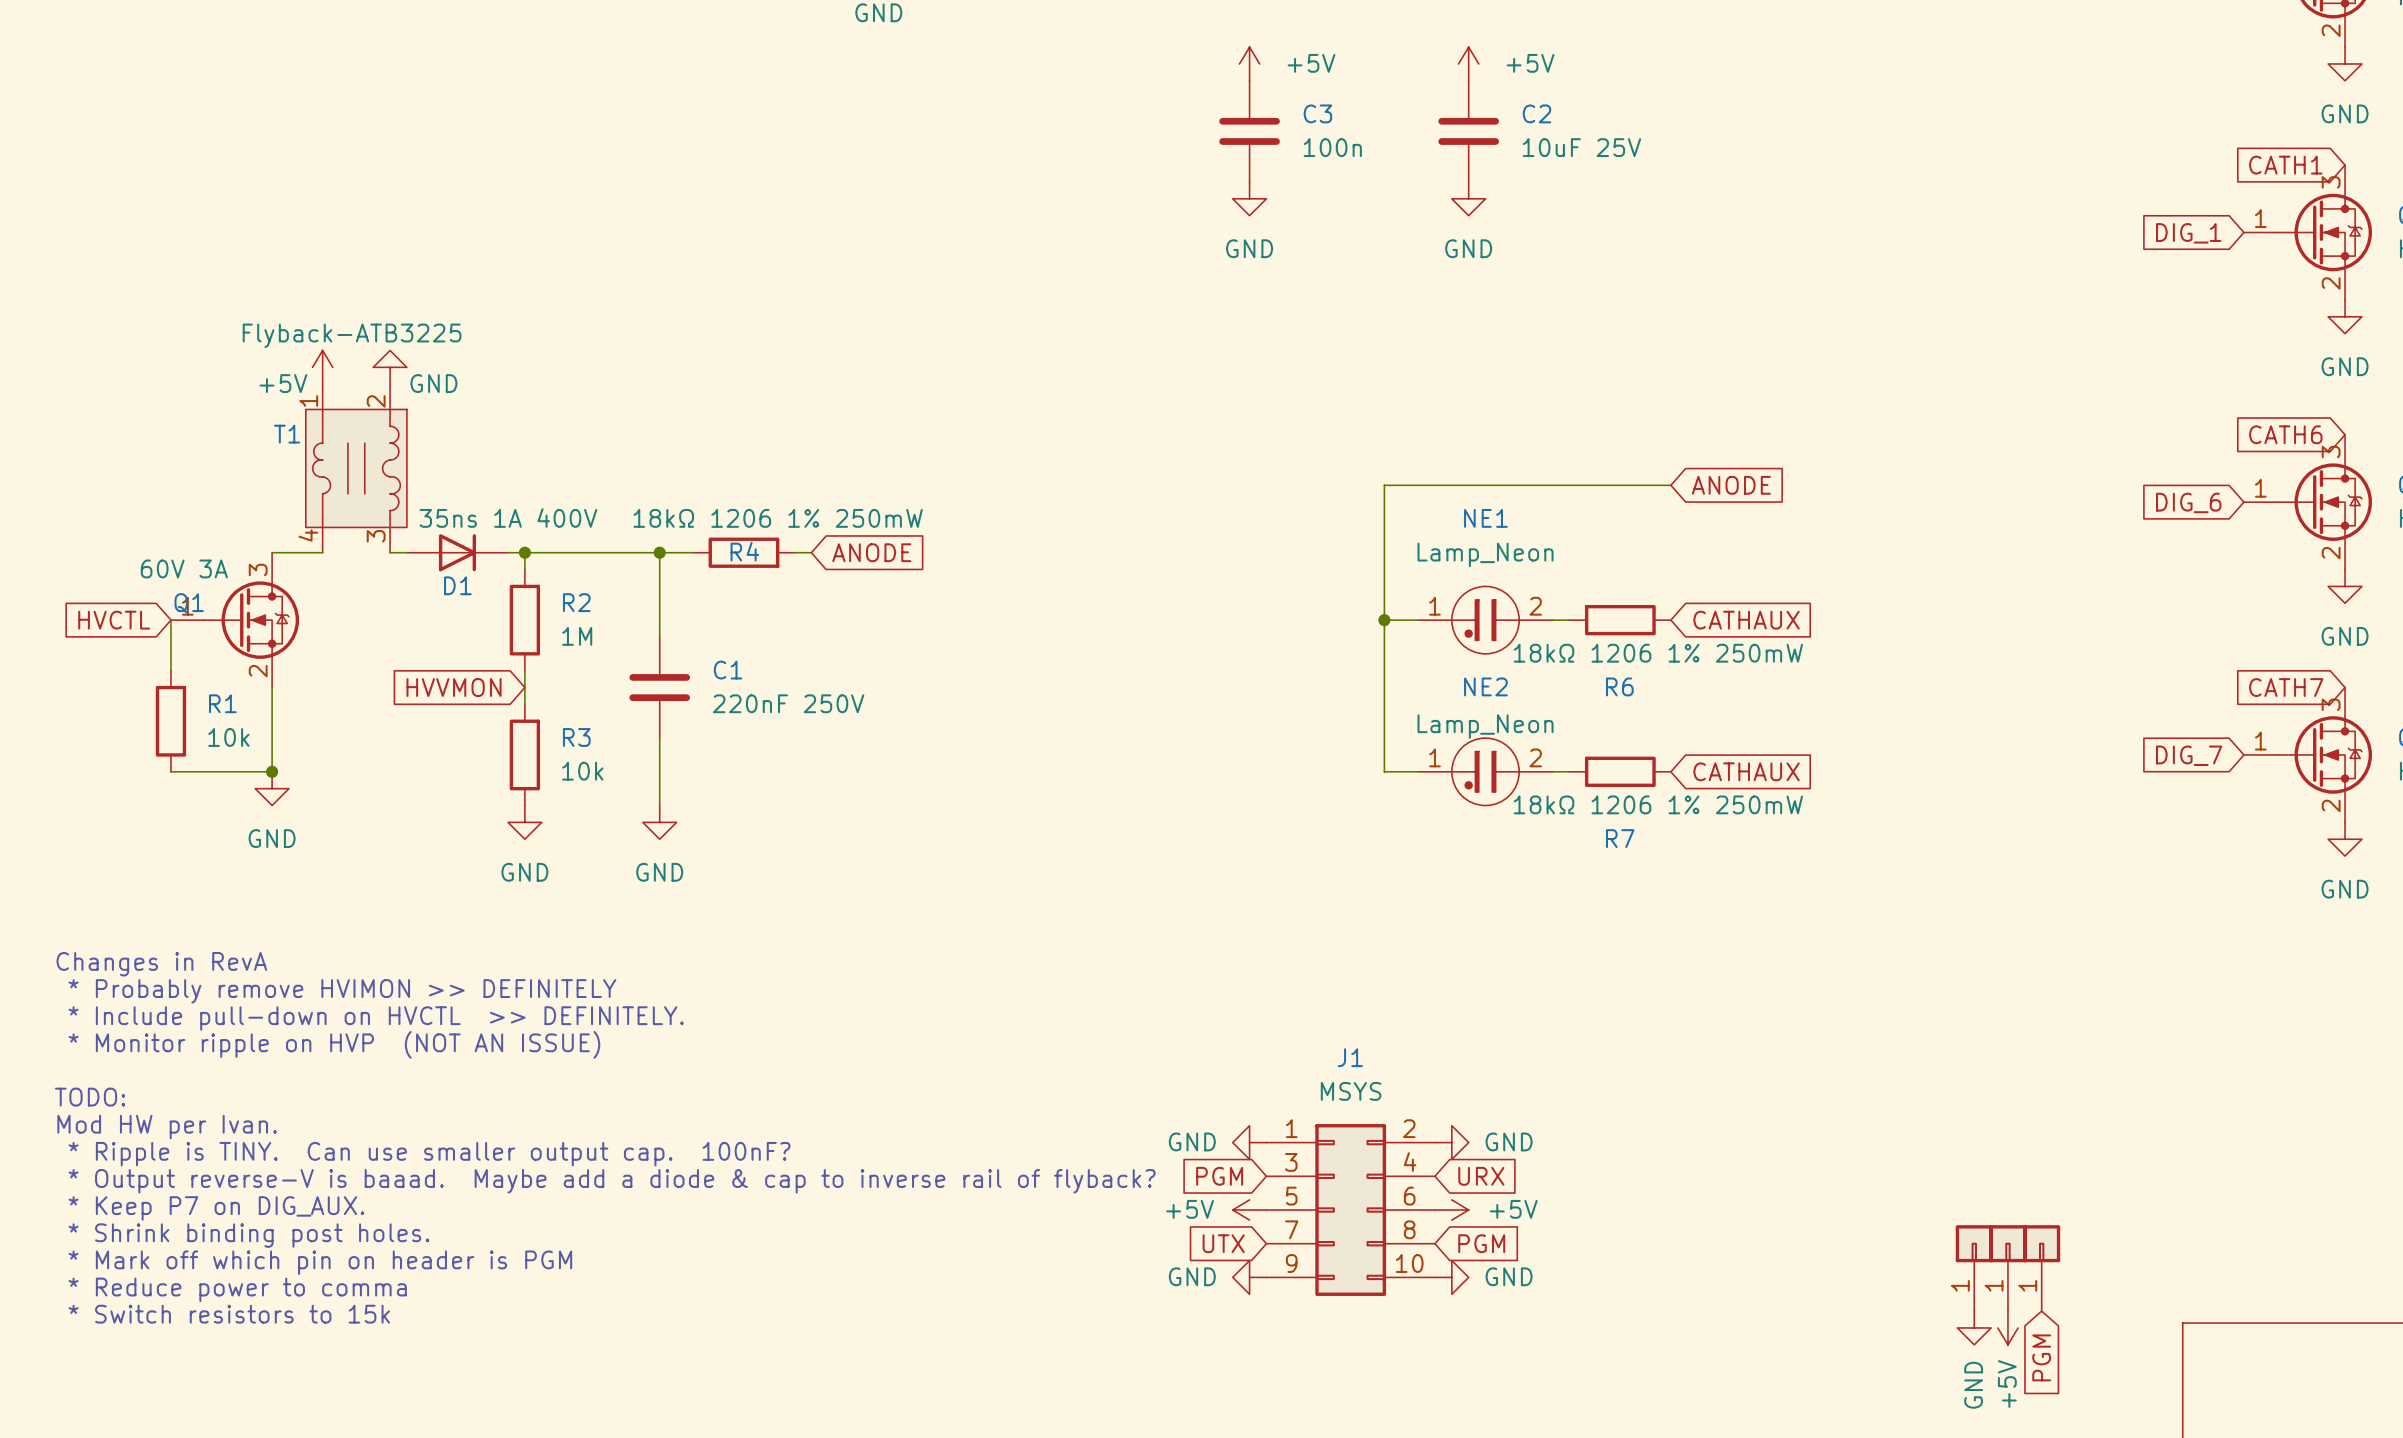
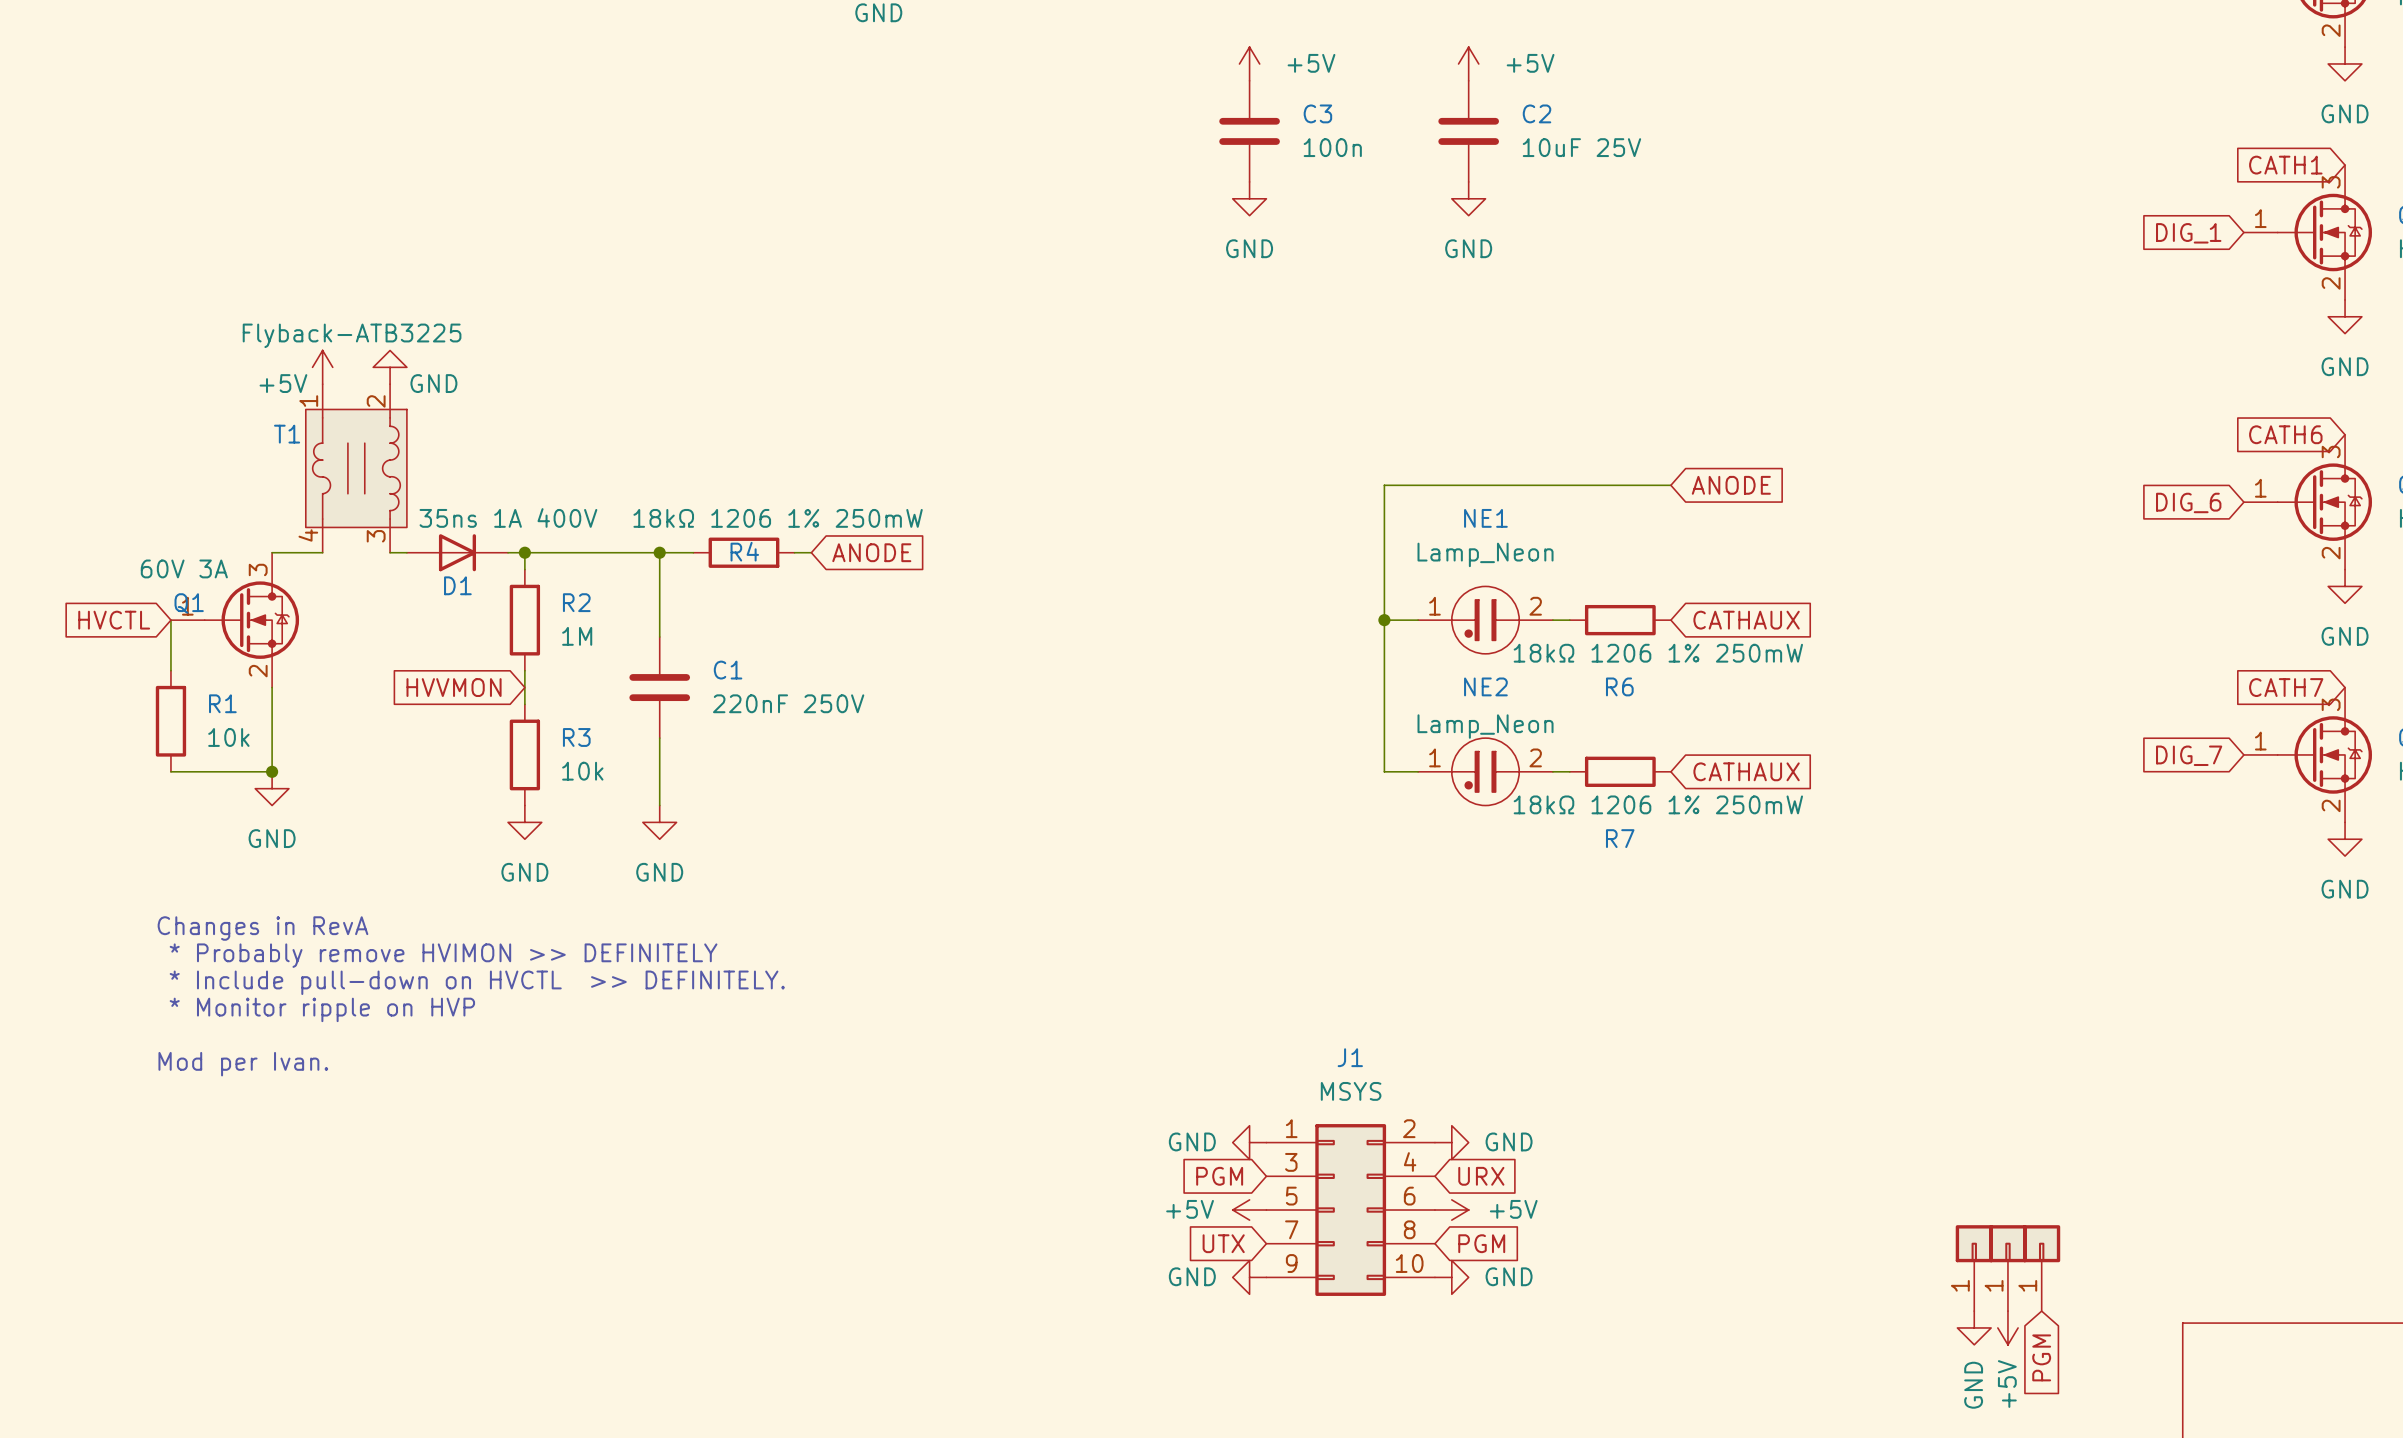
text position: Changes in RevA (161, 964) -> Changes in RevA (262, 928)
text position: * Probably remove HVIMON >> DEFINITELY (342, 991) -> * Probably remove HVIMON >> DEFINITELY (443, 955)
text: none -> * Monitor ripple on HVP (322, 1009)
text position: * Include pull-down on HVCTL >> DEFINITELY. (376, 1018) -> * Include pull-down on HVCTL >> DEFINITELY. (477, 982)
text: * Monitor ripple on HVP (NOT AN ISSUE) (334, 1044) -> none
text: none -> Mod per Ivan. (243, 1064)
text: TODO: (90, 1097) -> none
text: Mod HW per Ivan. (167, 1127) -> none
text: * Ripple is TINY. Can use smaller output cap. 100nF? (429, 1154) -> none
text: * Output reverse-V is baaad. Maybe add a diode & cap to inverse rail of flyback? (612, 1181) -> none
text: * Keep P7 on DIG_AUX. (216, 1208) -> none
text: * Shrink binding post holes. (248, 1235) -> none
text: * Mark off which pin on header is PGM (320, 1262) -> none
text: * Reduce power to comma (237, 1289) -> none
text: * Switch resistors to 15k (229, 1314) -> none

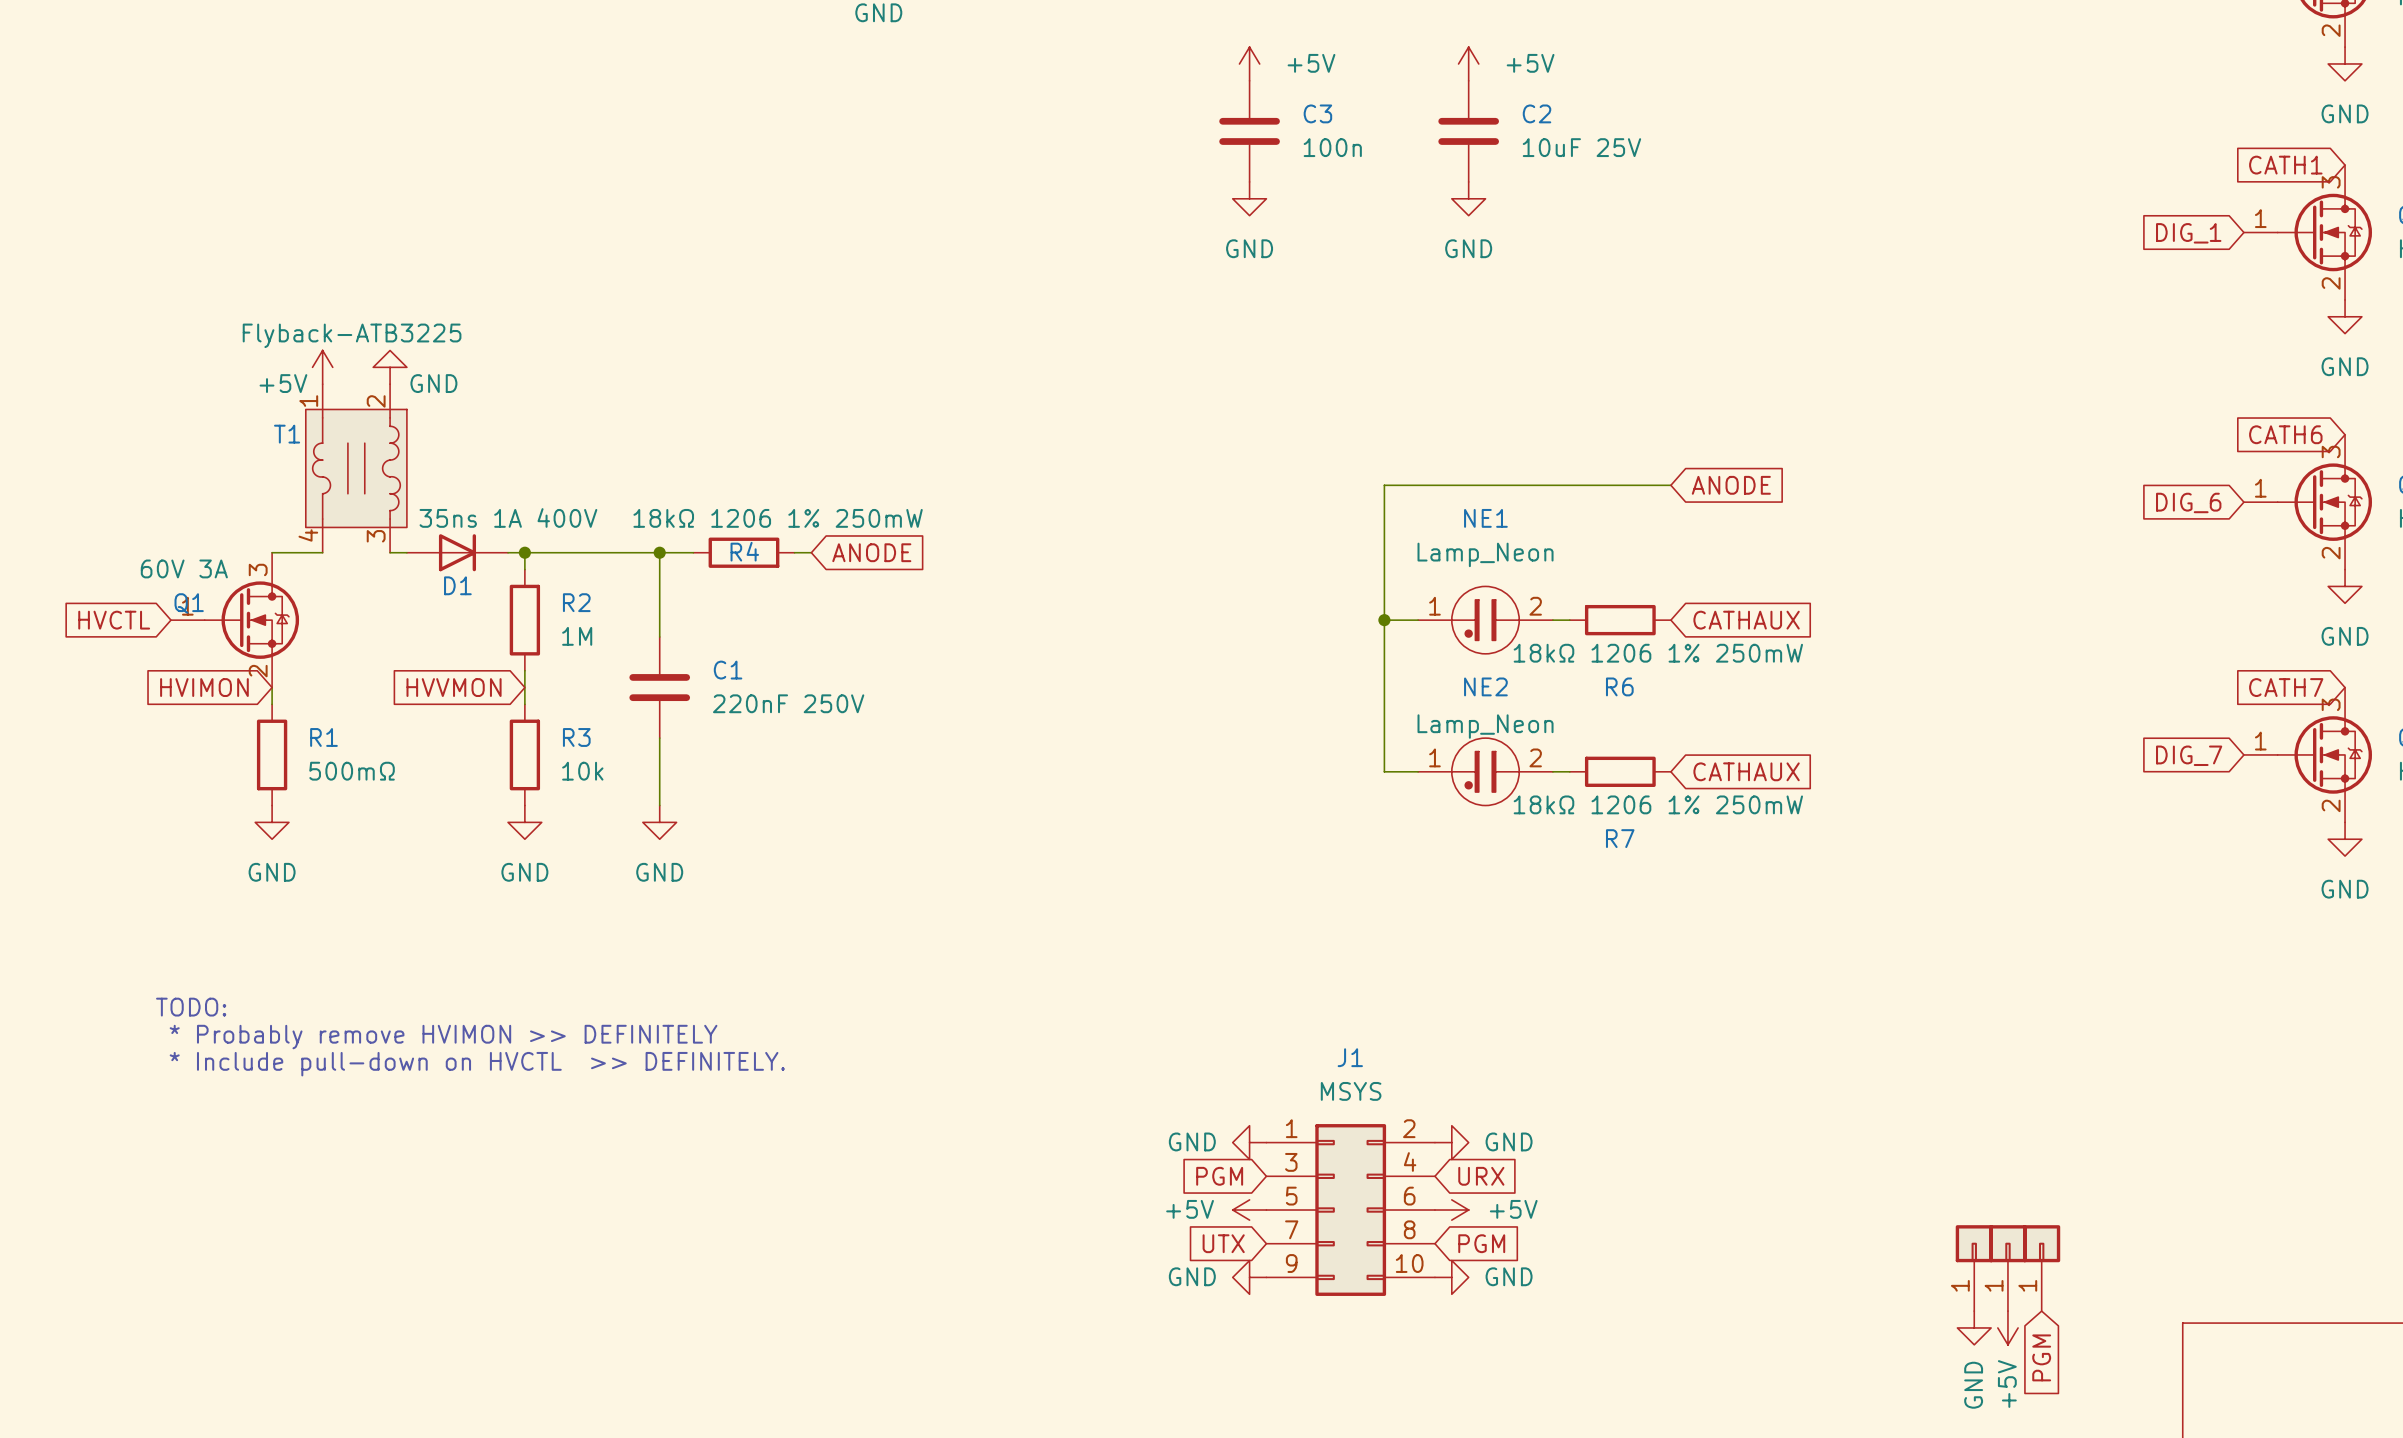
wire: (170, 620) (170, 670) -> none
global label: none -> HVIMON (204, 687)
wire: (272, 704) (272, 771) (170, 771) -> none
R1 position: (170, 721) -> (272, 754)
R1 value: 10k (228, 737) -> 500mΩ (352, 771)
junction: (272, 771) -> none
power symbol position: GND (272, 788) -> GND (272, 822)
text: Changes in RevA (262, 928) -> none
text position: * Probably remove HVIMON >> DEFINITELY (443, 955) -> * Probably remove HVIMON >> DEFINITELY (443, 1037)
text: * Include pull-down on HVCTL >> DEFINITELY. (477, 982) -> none
text: * Monitor ripple on HVP (322, 1009) -> TODO: (191, 1007)
text: Mod per Ivan. (243, 1064) -> * Include pull-down on HVCTL >> DEFINITELY. (477, 1064)

